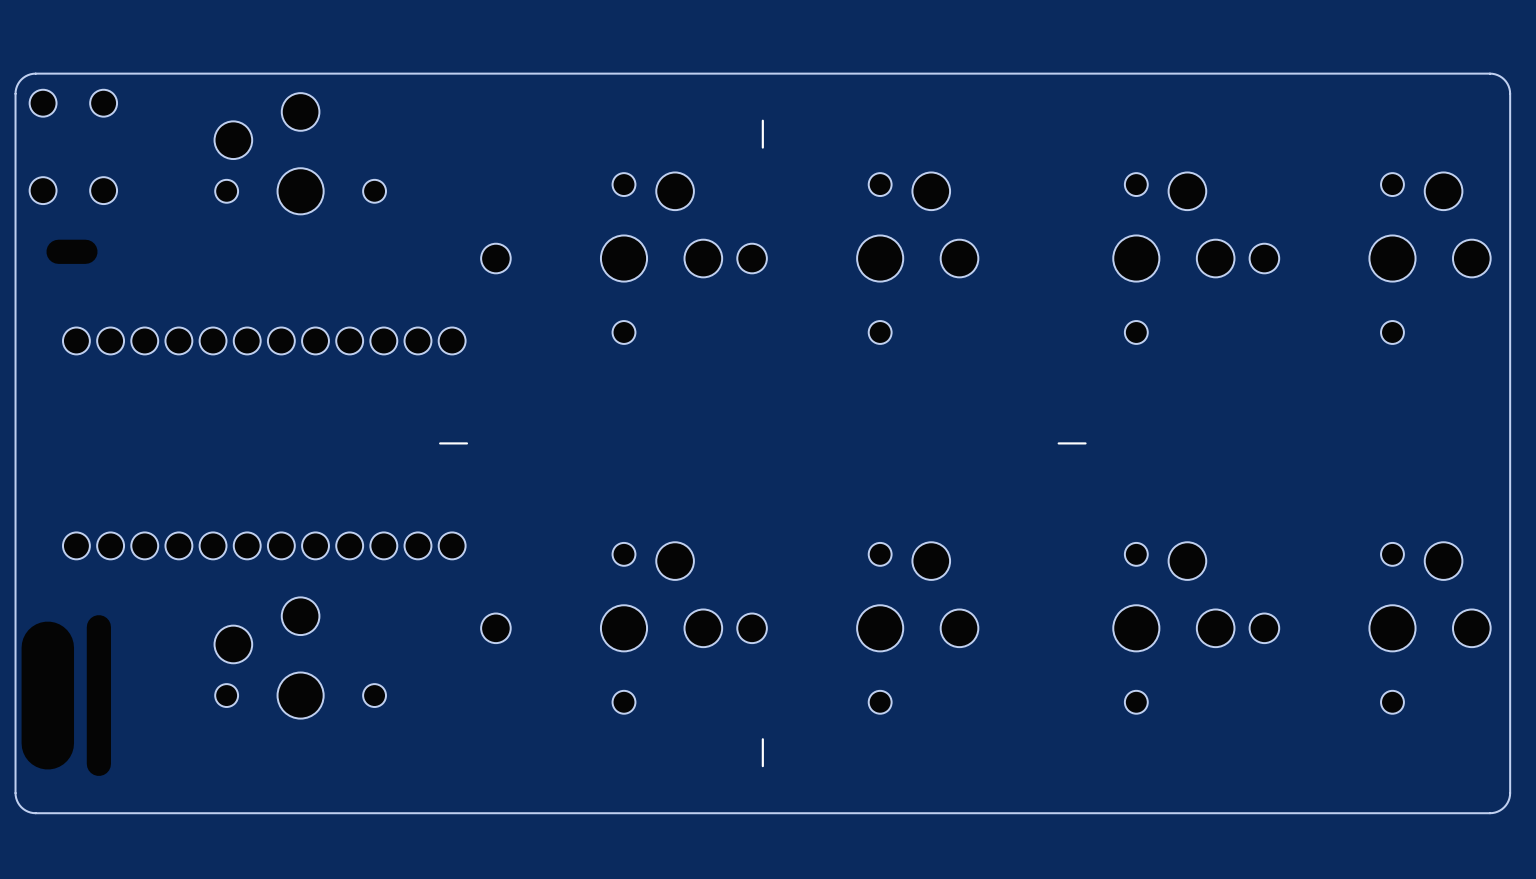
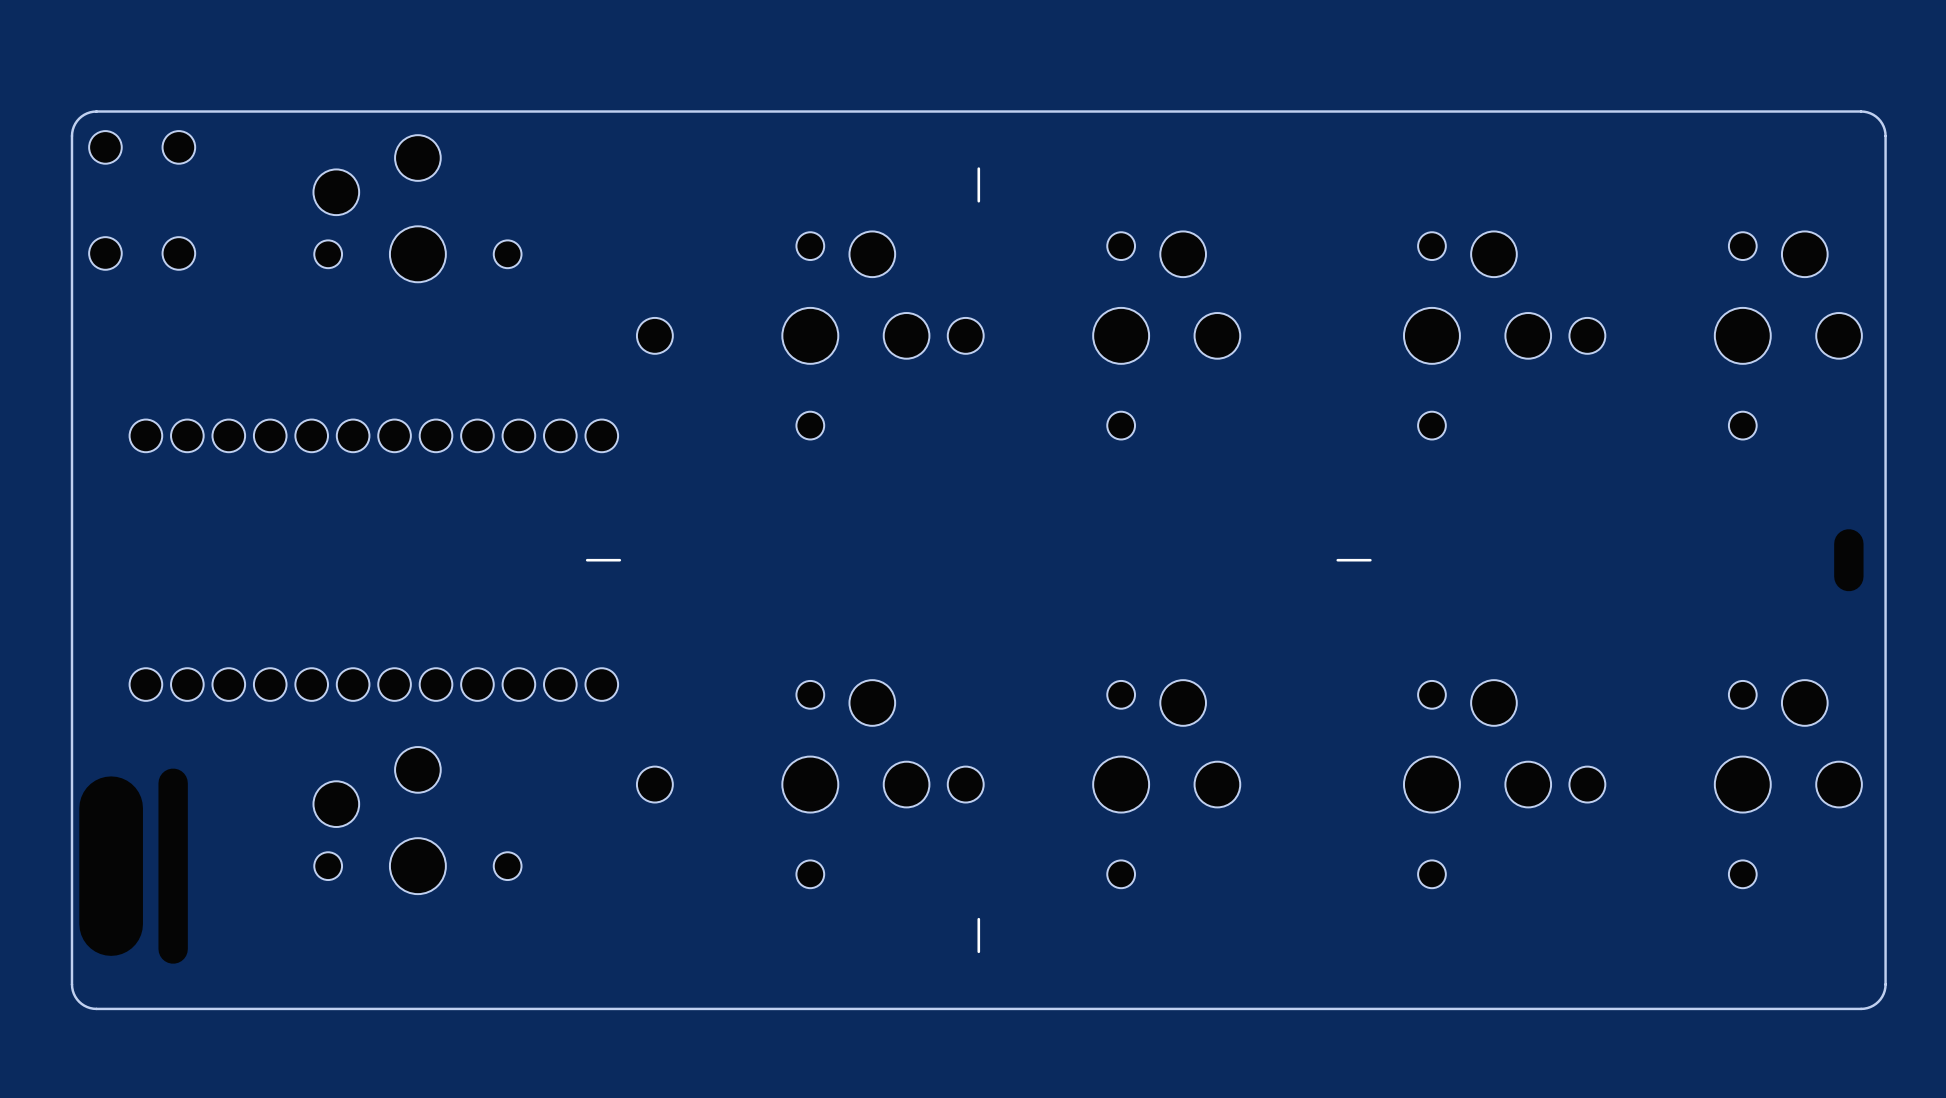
part: (72, 251) -> none
part: none -> (1848, 560)

